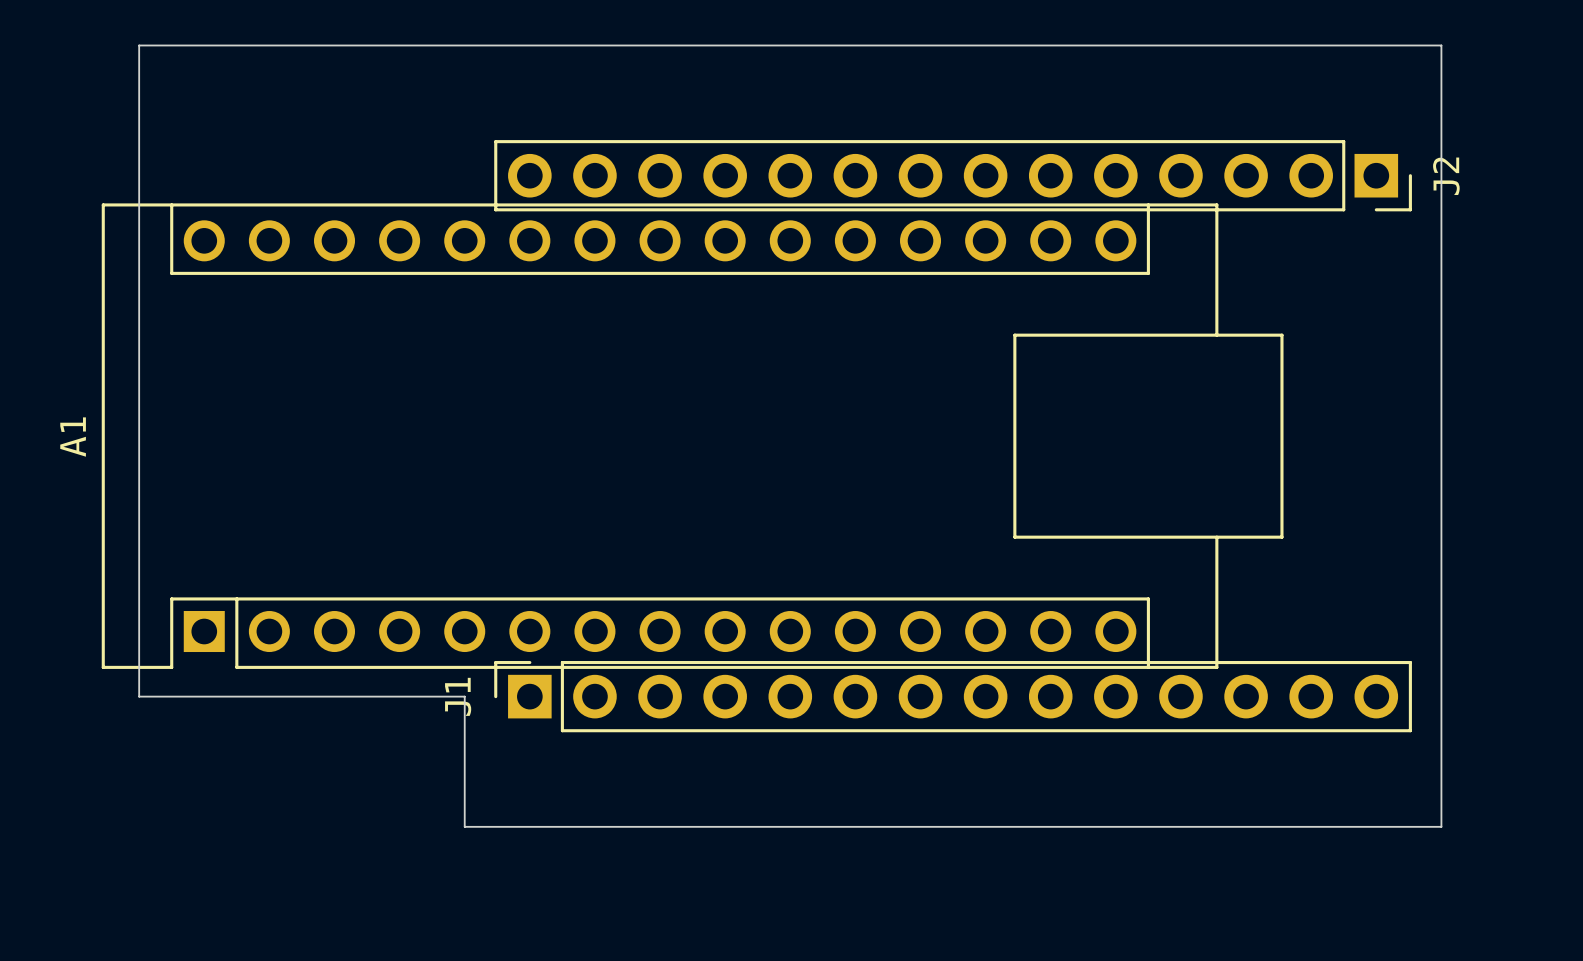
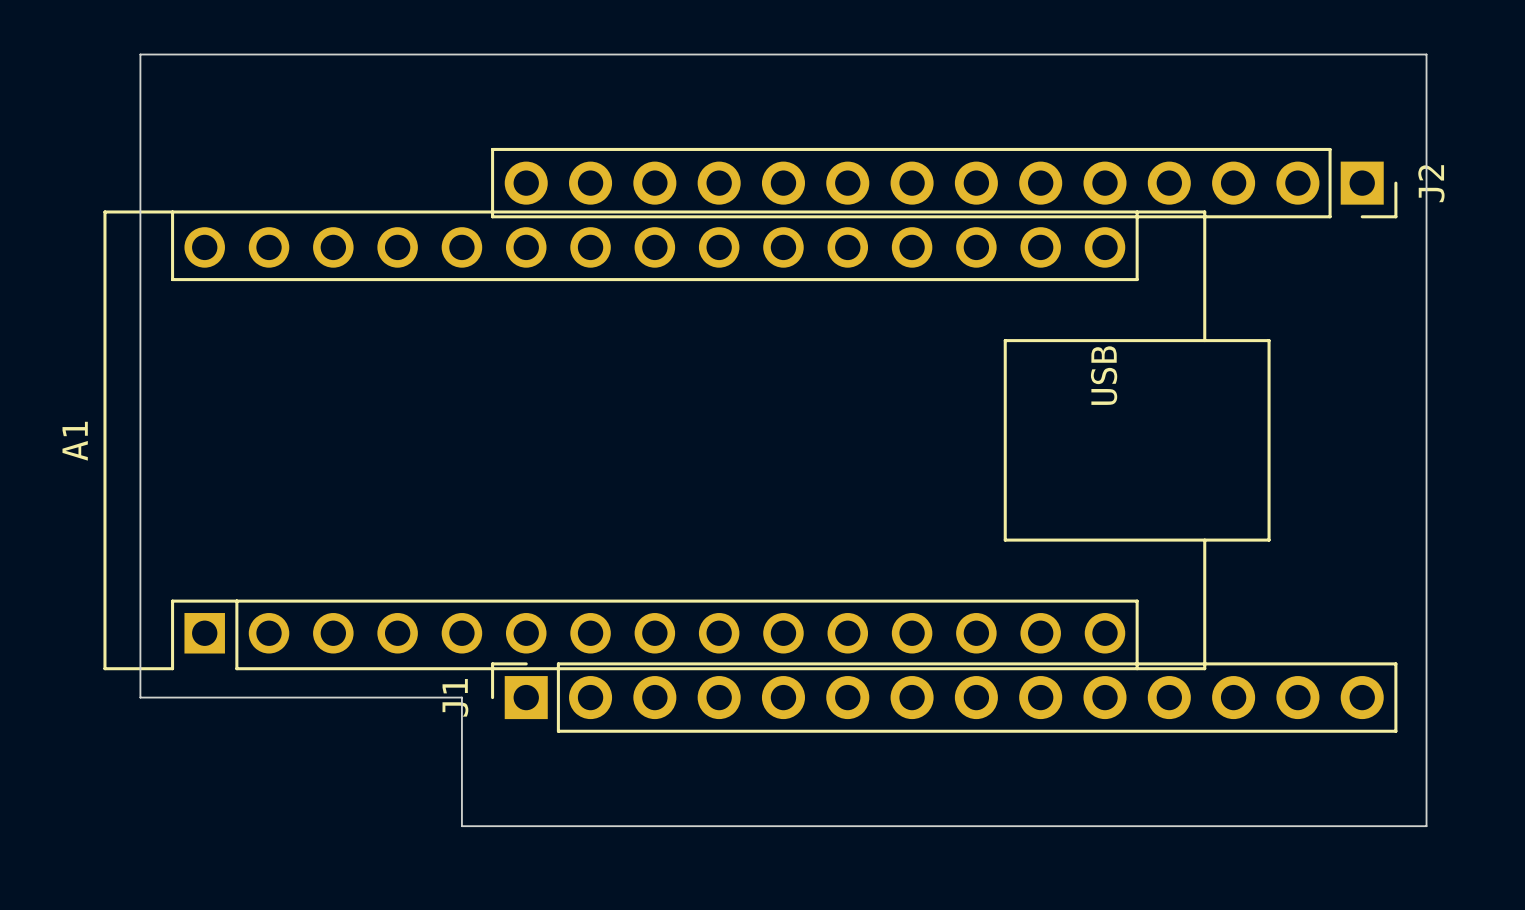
A1 text: none -> USB (1104, 375)

